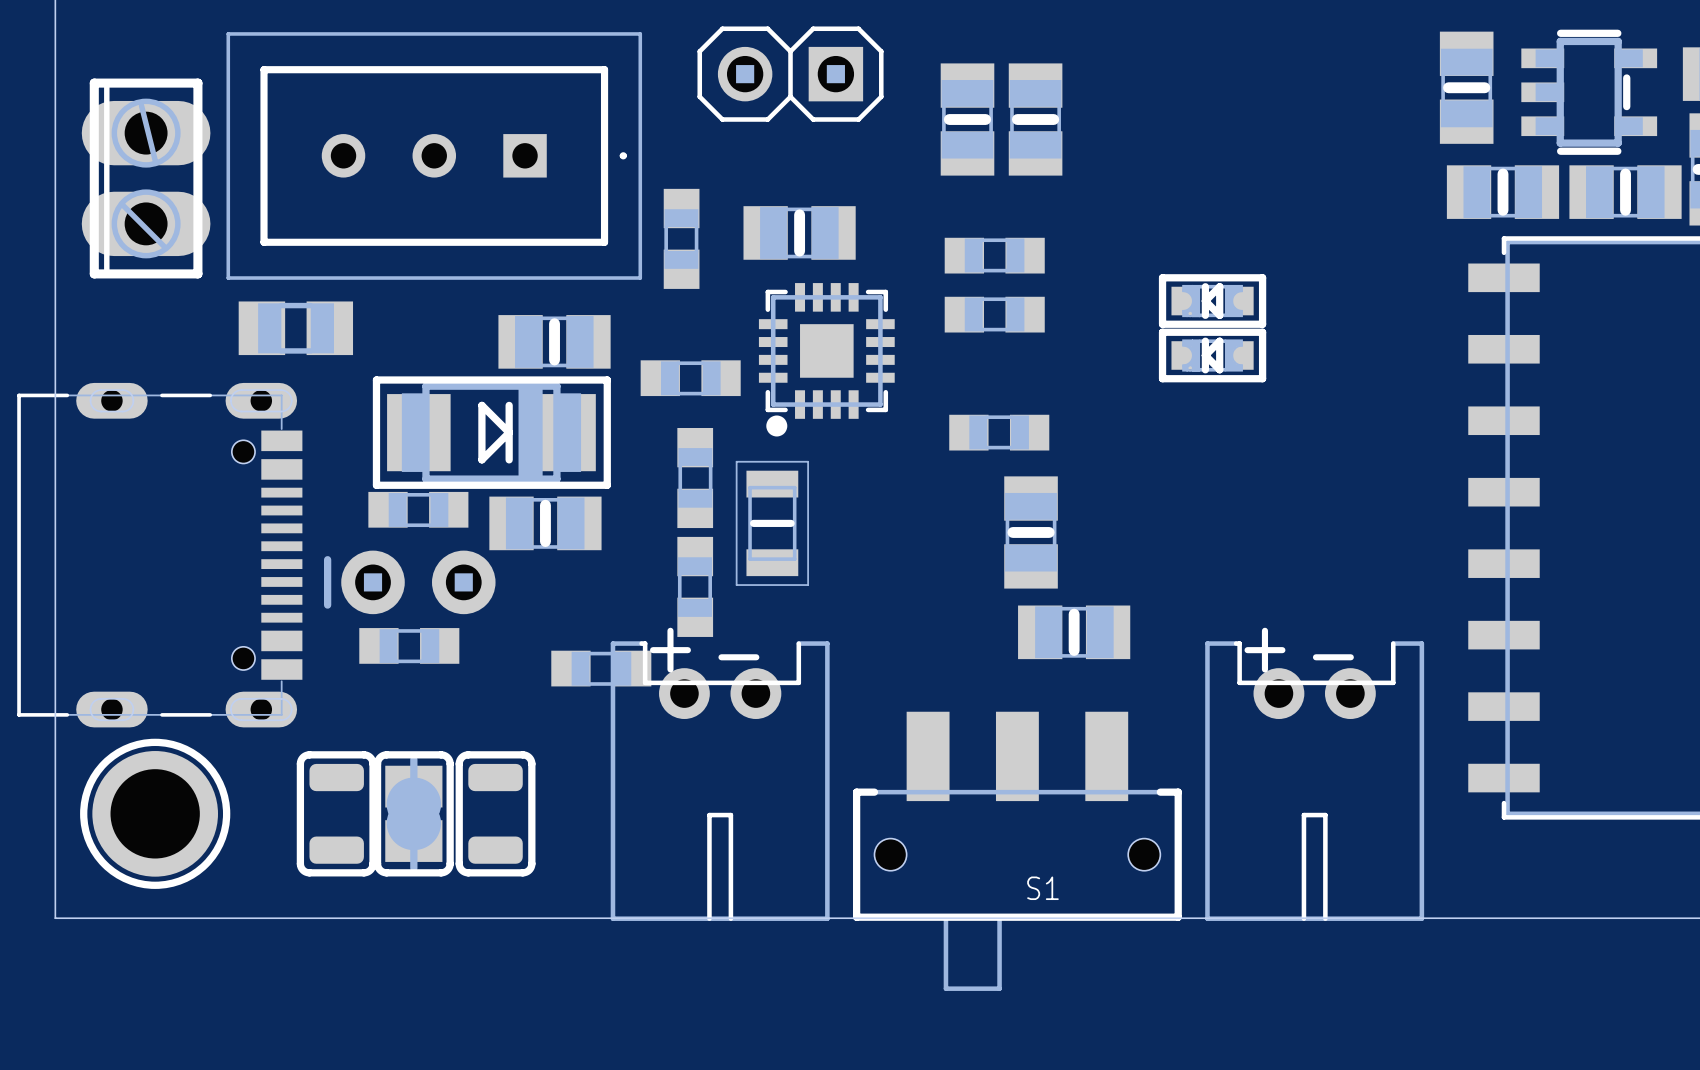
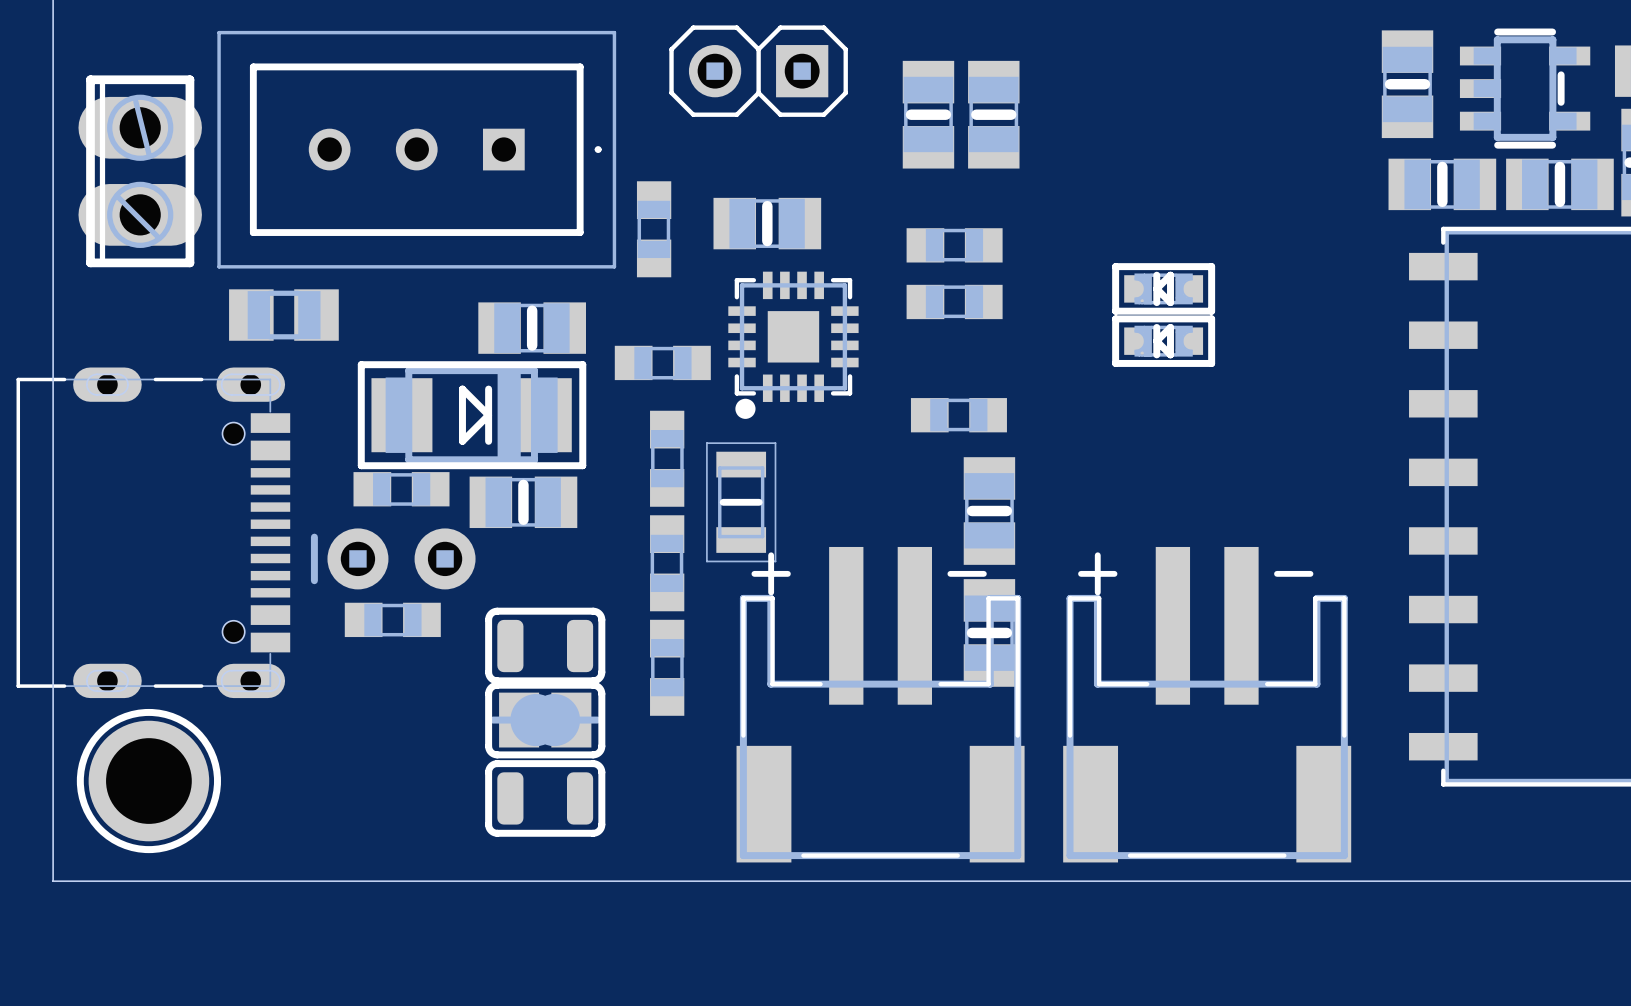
part rotation: 0° (1074, 632) -> 90° clockwise (989, 632)
part footprint: [551, 650, 652, 687] -> [485, 607, 606, 685]
part: none -> (667, 667)
part: none -> (880, 704)
part: none -> (1207, 704)
part: (720, 781) -> none
part: (1314, 781) -> none
part: (336, 813) -> none
part rotation: 0° (413, 813) -> 90° clockwise (545, 720)
part position: (413, 813) -> (545, 720)
part rotation: 0° (495, 813) -> 90° clockwise (545, 798)
S1: (1017, 851) -> none

